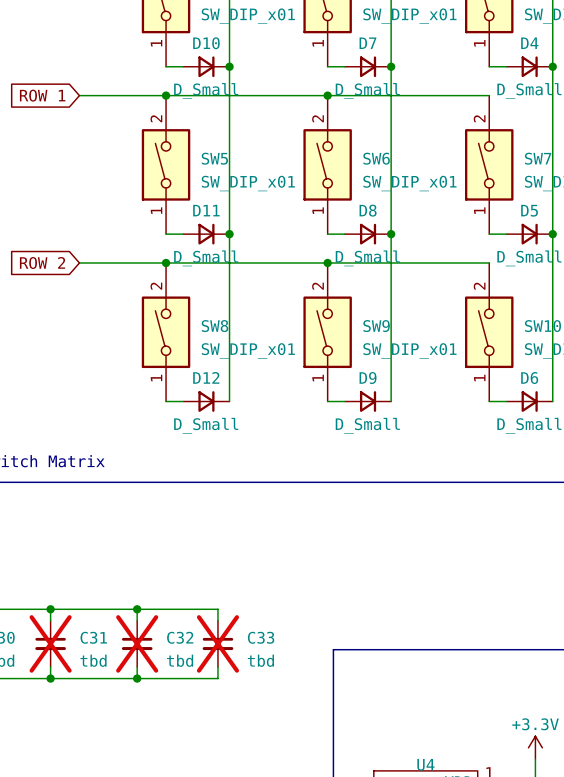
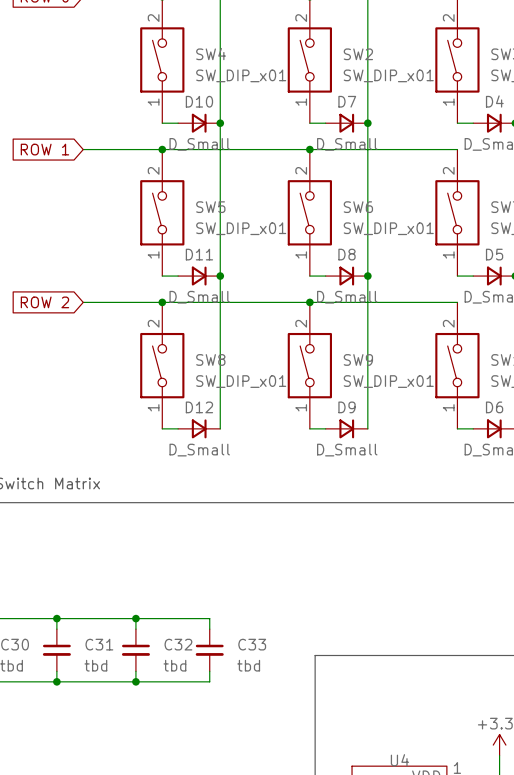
C31 do-not-place cross: (50, 643) -> none
C32 do-not-place cross: (137, 643) -> none
C33 do-not-place cross: (217, 643) -> none

